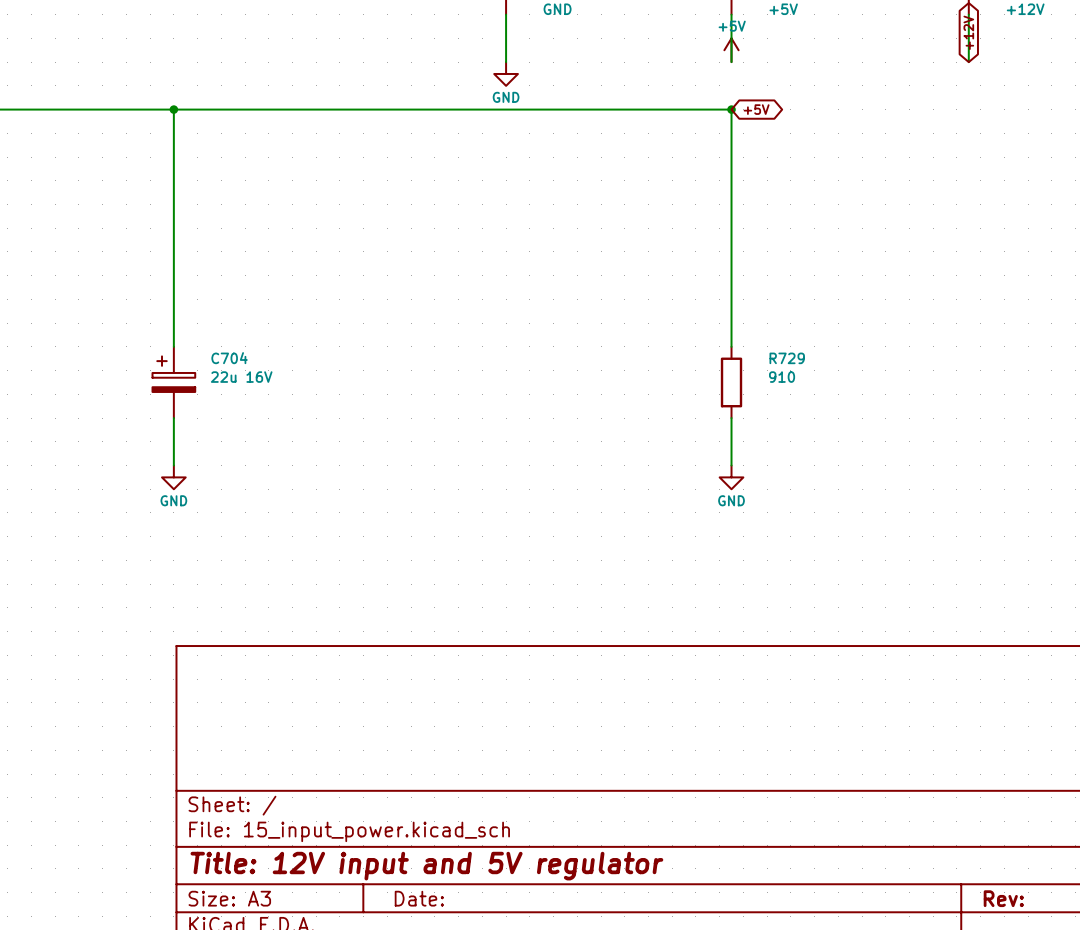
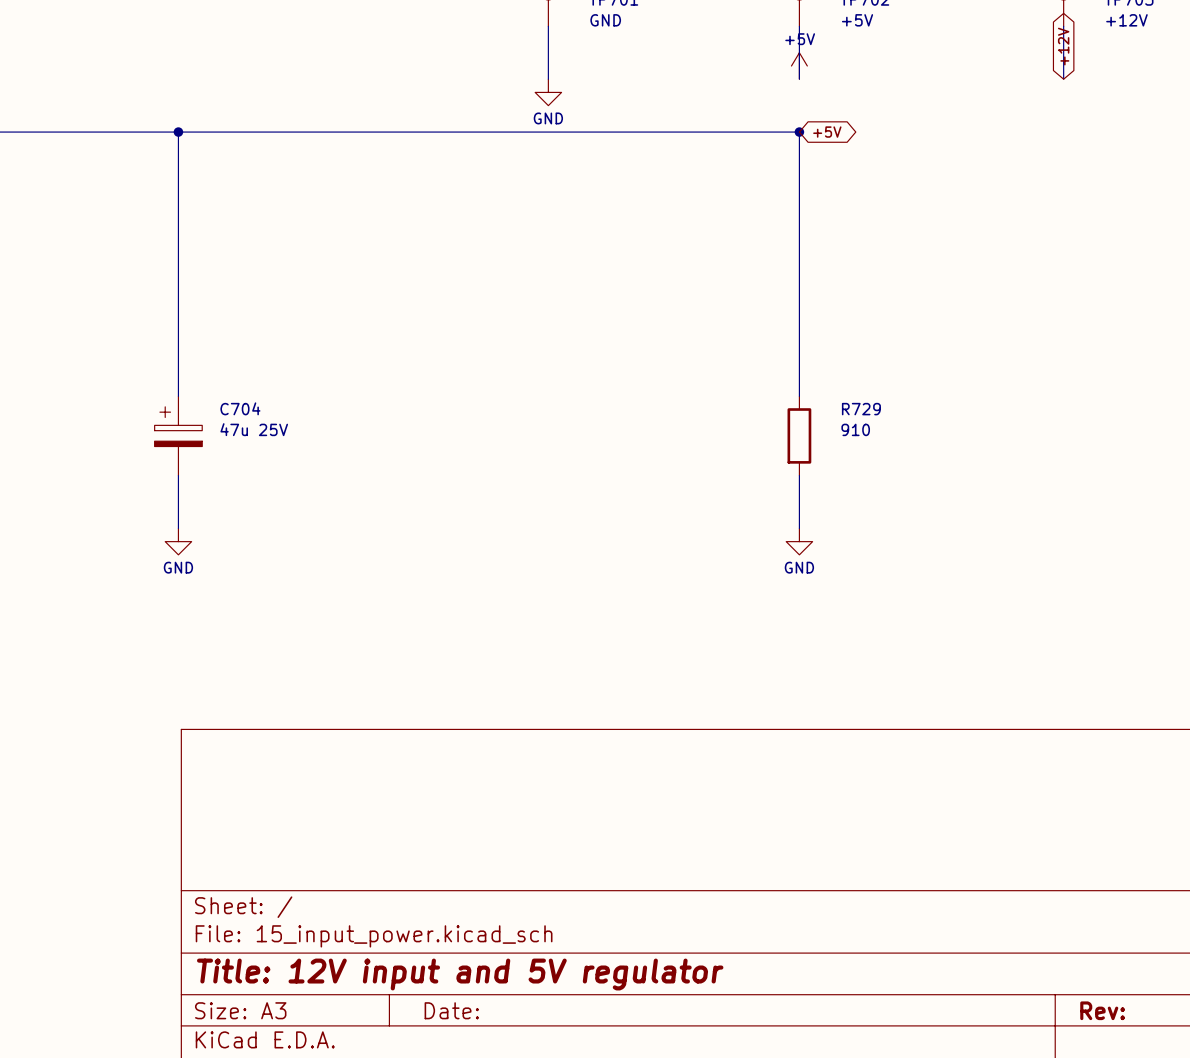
C704 value: 22u 16V (241, 377) -> 47u 25V (254, 429)

